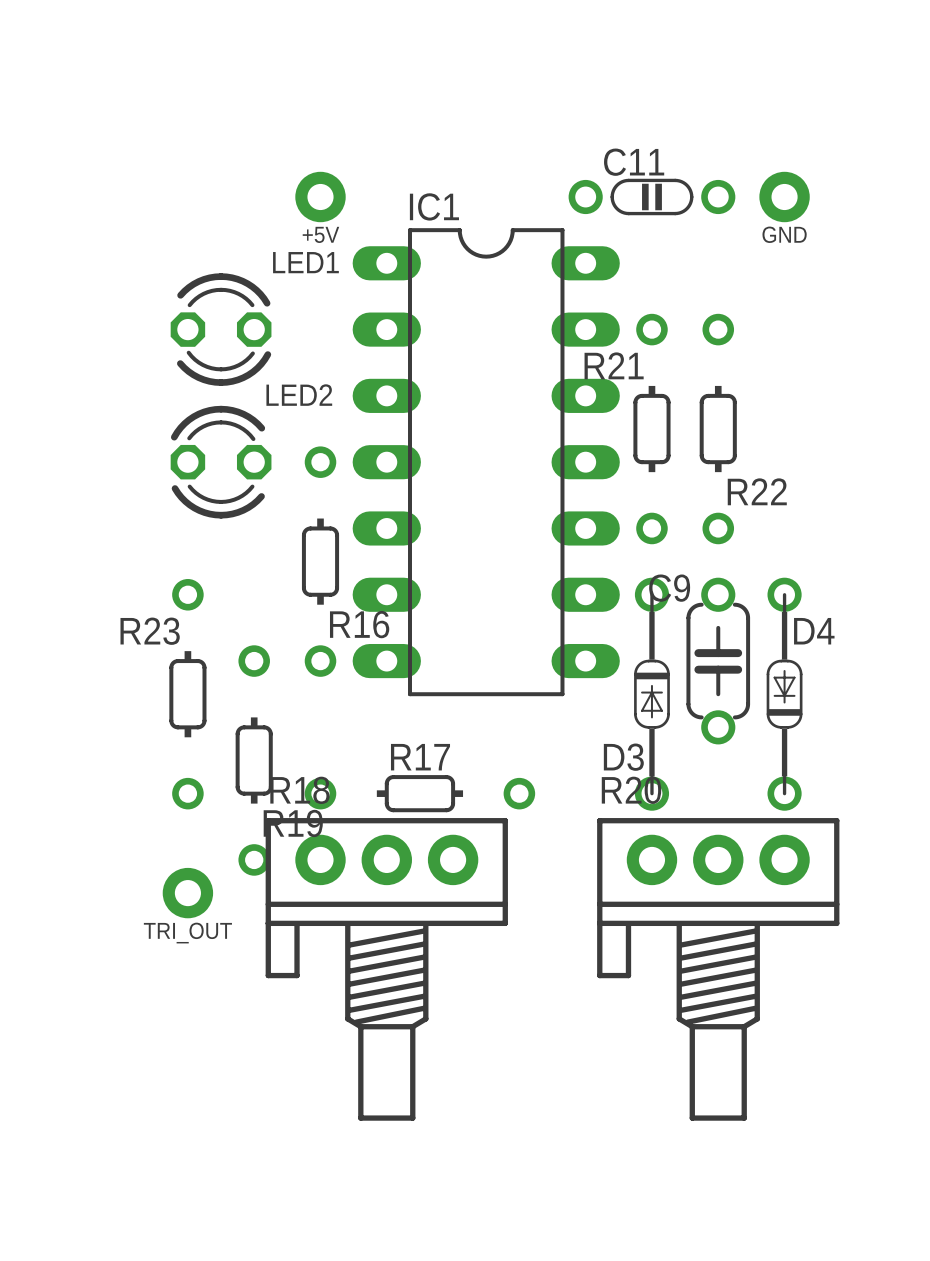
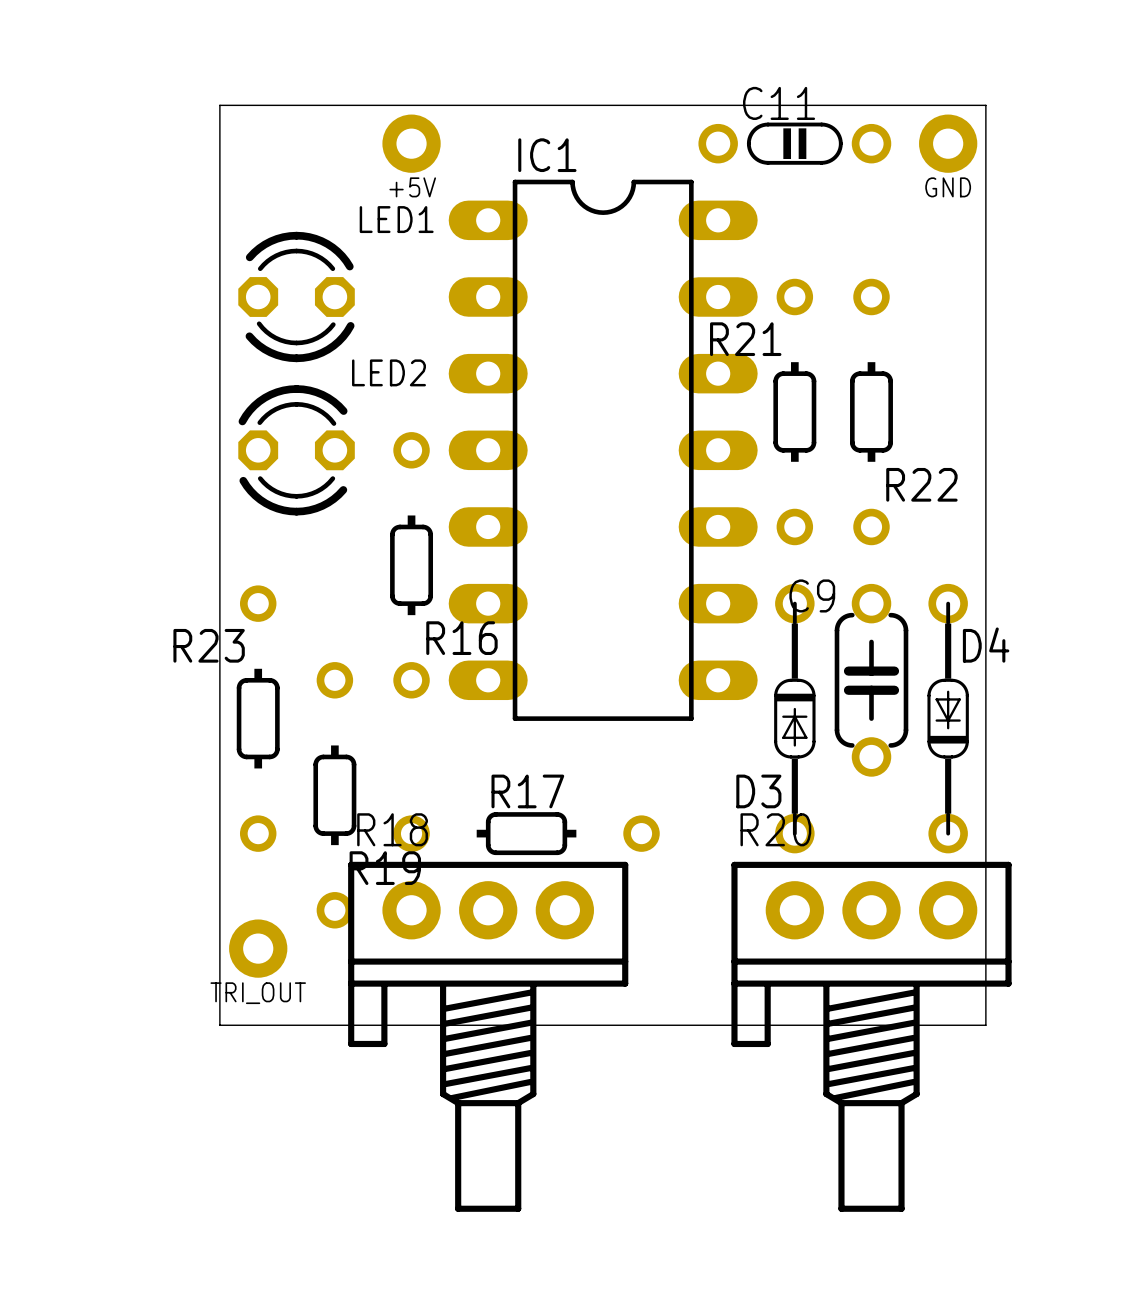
board edge: none -> (219, 105) (985, 105) (985, 1025) (219, 1025) (219, 105)

